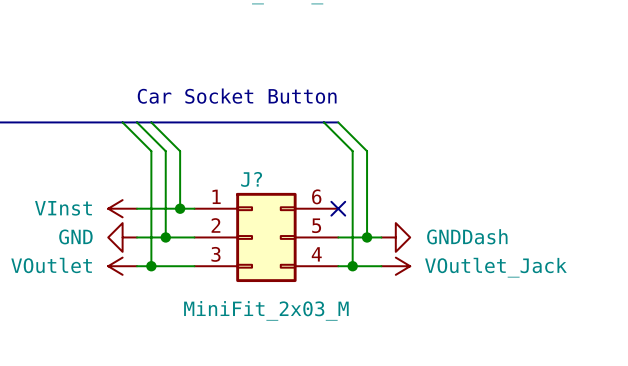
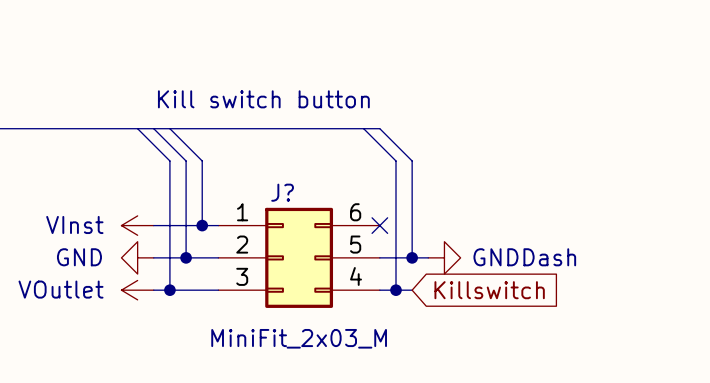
text: Car Socket Button (237, 96) -> none
text: none -> Kill switch button (263, 99)
wire: (367, 266) (381, 266) -> none
power symbol: VOutlet_Jack (395, 266) -> none
global label: none -> Killswitch (489, 290)

